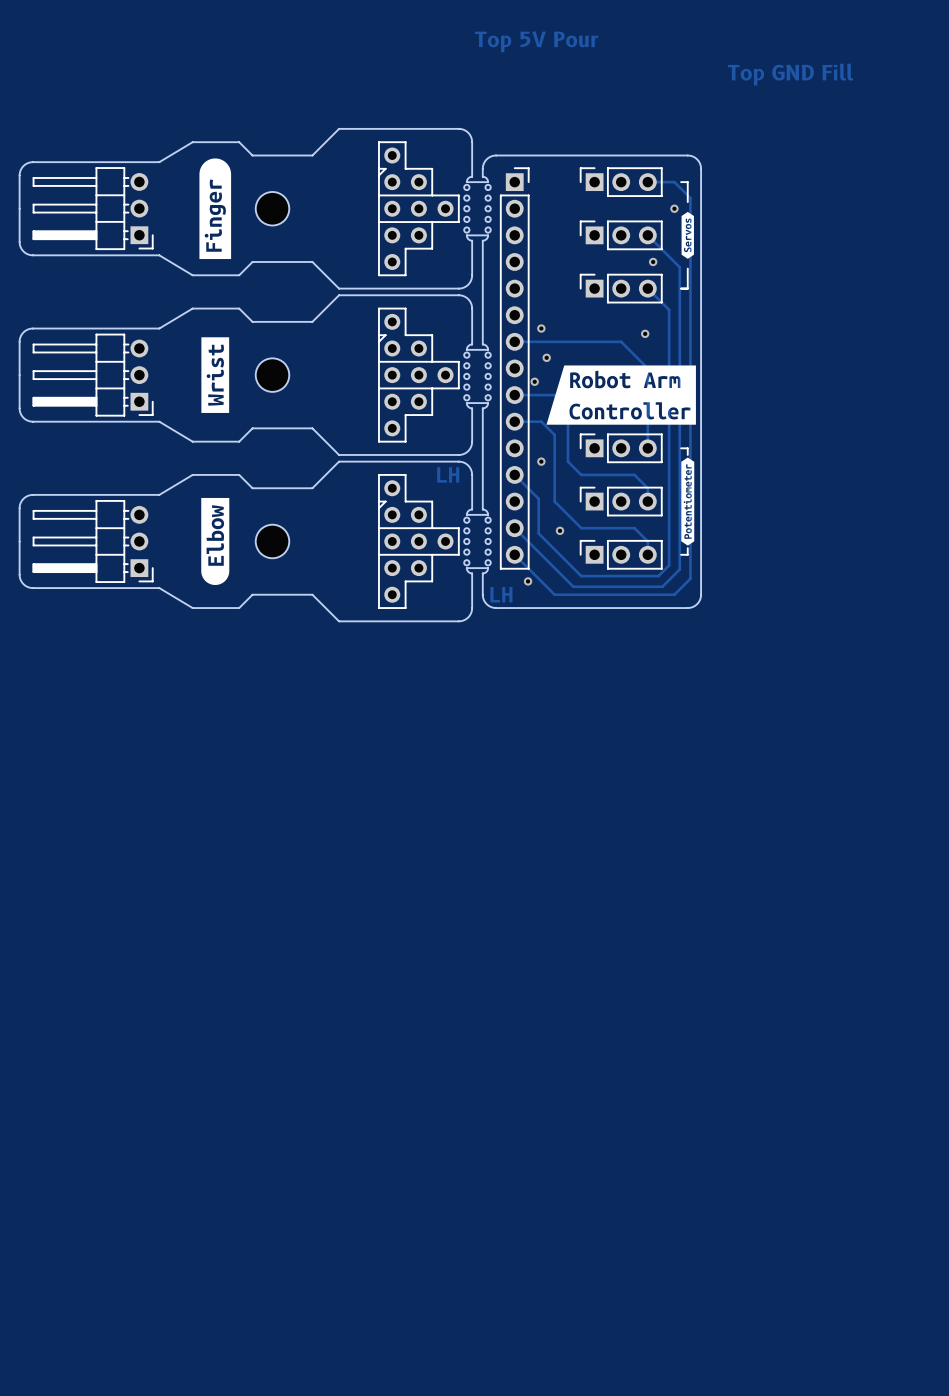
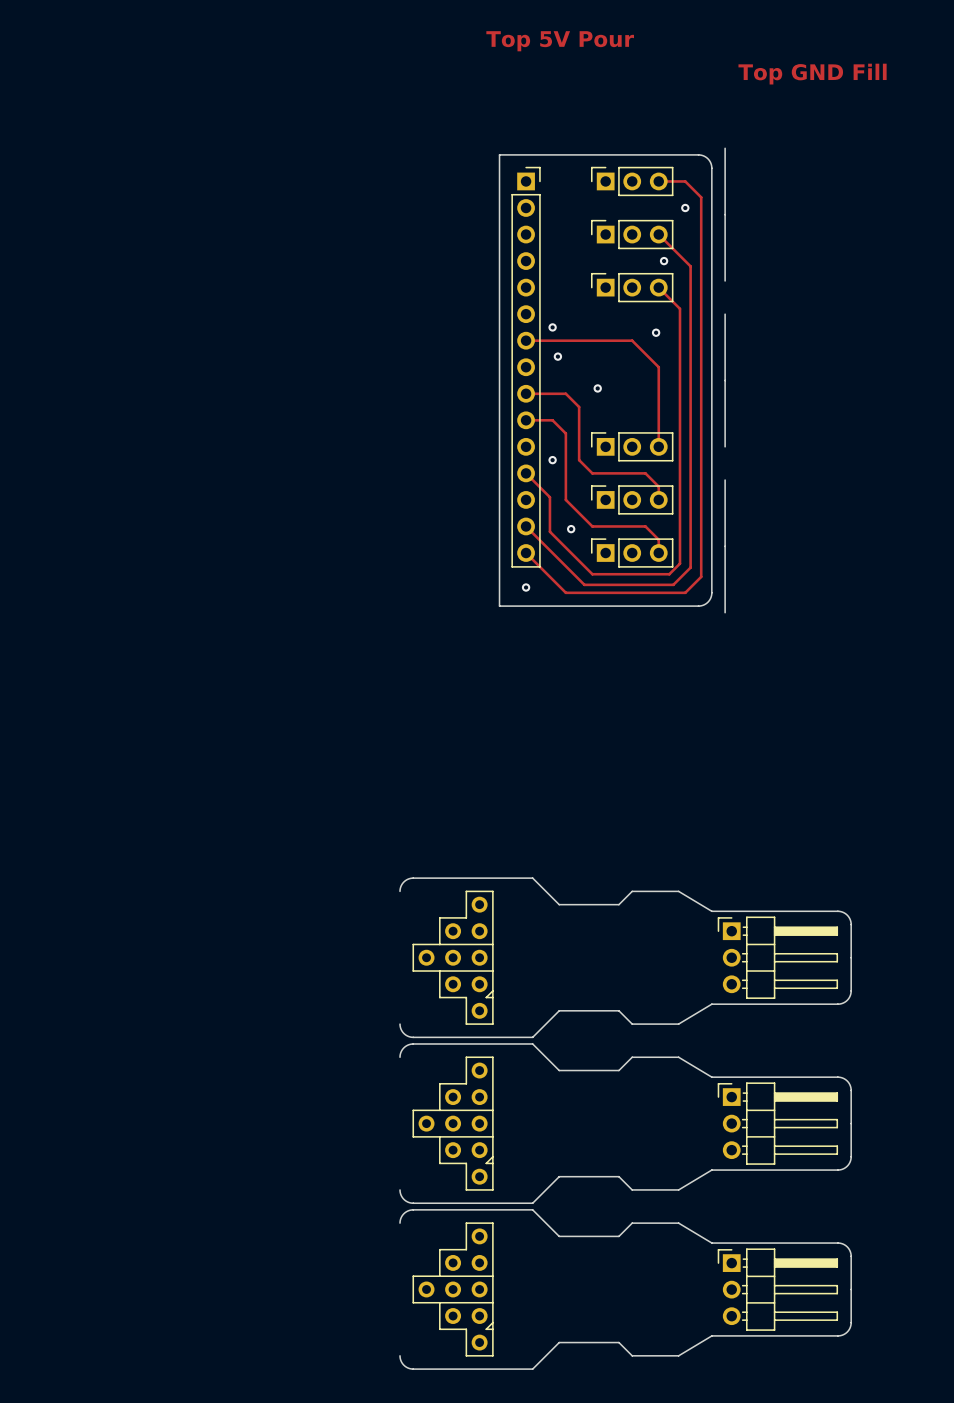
board edge: none -> (725, 148) (725, 280)
board edge: (496, 155) (487, 158) (483, 164) (482, 176) (486, 178) (488, 182) (466, 182) (468, 178) (472, 176) (472, 142) (470, 135) (464, 130) (339, 128) (312, 155) (252, 155) (239, 142) (192, 142) (159, 162) (31, 162) (23, 166) (19, 175) (19, 243) (23, 251) (31, 255) (159, 255) (192, 275) (239, 275) (252, 261) (312, 261) (339, 288) (458, 288) (467, 285) (472, 276) (472, 240) (468, 239) (466, 235) (488, 235) (486, 239) (482, 240) (482, 344) (486, 346) (488, 349) (466, 349) (468, 346) (472, 344) (472, 307) (468, 299) (458, 295) (339, 295) (312, 321) (252, 321) (239, 308) (192, 308) (159, 328) (31, 328) (22, 333) (19, 341) (19, 409) (23, 417) (31, 421) (159, 421) (192, 441) (239, 441) (252, 428) (312, 428) (339, 454) (458, 454) (468, 451) (472, 443) (472, 408) (468, 406) (466, 403) (488, 403) (486, 406) (482, 408) (482, 509) (486, 511) (488, 514) (466, 514) (468, 511) (472, 509) (472, 473) (467, 464) (458, 461) (339, 461) (312, 488) (252, 488) (239, 474) (192, 474) (159, 494) (31, 494) (23, 498) (19, 506) (19, 574) (23, 584) (32, 588) (159, 588) (192, 608) (239, 608) (252, 594) (312, 594) (339, 621) (458, 621) (467, 618) (472, 609) (472, 573) (468, 571) (466, 568) (488, 568) (486, 571) (482, 573) (483, 597) (487, 605) (496, 608) -> (507, 154) (499, 154) (499, 606) (507, 606)
drawing: [199, 158, 232, 260] -> none
line: (681, 182) (687, 182) (687, 202) -> none
round board edge: [463, 184, 471, 191] -> none
round board edge: [484, 184, 492, 191] -> none
round board edge: [463, 194, 471, 202] -> none
round board edge: [484, 194, 492, 202] -> none
round board edge: [463, 205, 471, 212] -> none
round board edge: [484, 205, 492, 212] -> none
part: (93, 208) -> none
part: (272, 208) -> none
part: (418, 208) -> none
drawing: [681, 211, 694, 259] -> none
round board edge: [463, 216, 471, 223] -> none
round board edge: [484, 216, 492, 223] -> none
round board edge: [463, 226, 471, 234] -> none
round board edge: [484, 226, 492, 234] -> none
line: (687, 268) (687, 288) (681, 288) -> none
board edge: none -> (725, 314) (725, 446)
drawing: [201, 337, 230, 413] -> none
round board edge: [463, 351, 471, 359] -> none
round board edge: [484, 351, 492, 359] -> none
round board edge: [463, 362, 471, 369] -> none
round board edge: [484, 362, 492, 369] -> none
drawing: [546, 365, 696, 425] -> none
round board edge: [463, 373, 471, 380] -> none
round board edge: [484, 373, 492, 380] -> none
part: (93, 375) -> none
part: (272, 375) -> none
part: (418, 375) -> none
via position: (534, 381) -> (597, 388)
round board edge: [463, 383, 471, 391] -> none
round board edge: [484, 383, 492, 391] -> none
round board edge: [463, 394, 471, 401] -> none
round board edge: [484, 394, 492, 401] -> none
line: (681, 448) (687, 448) (687, 454) -> none
drawing: [681, 457, 695, 546] -> none
drawing: [437, 467, 460, 483] -> none
board edge: none -> (725, 480) (725, 612)
drawing: [201, 497, 230, 586] -> none
round board edge: [463, 517, 471, 524] -> none
round board edge: [484, 517, 492, 524] -> none
round board edge: [463, 527, 471, 535] -> none
round board edge: [484, 527, 492, 535] -> none
round board edge: [463, 538, 471, 545] -> none
round board edge: [484, 538, 492, 545] -> none
part: (93, 541) -> none
part: (272, 541) -> none
part: (418, 541) -> none
round board edge: [463, 548, 471, 556] -> none
round board edge: [484, 548, 492, 556] -> none
line: (687, 548) (687, 554) (681, 554) -> none
round board edge: [463, 559, 471, 566] -> none
round board edge: [484, 559, 492, 566] -> none
via position: (528, 581) -> (526, 587)
drawing: [490, 587, 513, 603] -> none
board edge: none -> (400, 891) (402, 883) (411, 878) (532, 878) (559, 904) (618, 904) (632, 891) (678, 891) (711, 911) (839, 911) (848, 916) (851, 924) (851, 992) (848, 999) (840, 1003) (711, 1004) (678, 1024) (632, 1024) (618, 1010) (559, 1010) (532, 1037) (411, 1037) (403, 1033) (400, 1024)
part: none -> (453, 957)
part: none -> (777, 957)
board edge: none -> (400, 1057) (403, 1047) (411, 1044) (532, 1043) (559, 1070) (618, 1070) (632, 1057) (678, 1057) (711, 1077) (839, 1077) (847, 1081) (851, 1090) (851, 1158) (848, 1165) (840, 1169) (711, 1170) (678, 1189) (632, 1189) (618, 1176) (559, 1176) (532, 1203) (411, 1203) (402, 1198) (400, 1189)
part: none -> (453, 1123)
part: none -> (777, 1123)
board edge: none -> (400, 1223) (402, 1214) (411, 1209) (532, 1209) (559, 1236) (618, 1236) (632, 1223) (678, 1223) (711, 1243) (839, 1243) (847, 1246) (851, 1256) (851, 1324) (847, 1332) (840, 1335) (711, 1335) (678, 1355) (632, 1355) (618, 1342) (559, 1342) (532, 1369) (411, 1369) (403, 1365) (400, 1355)
part: none -> (453, 1289)
part: none -> (777, 1289)

